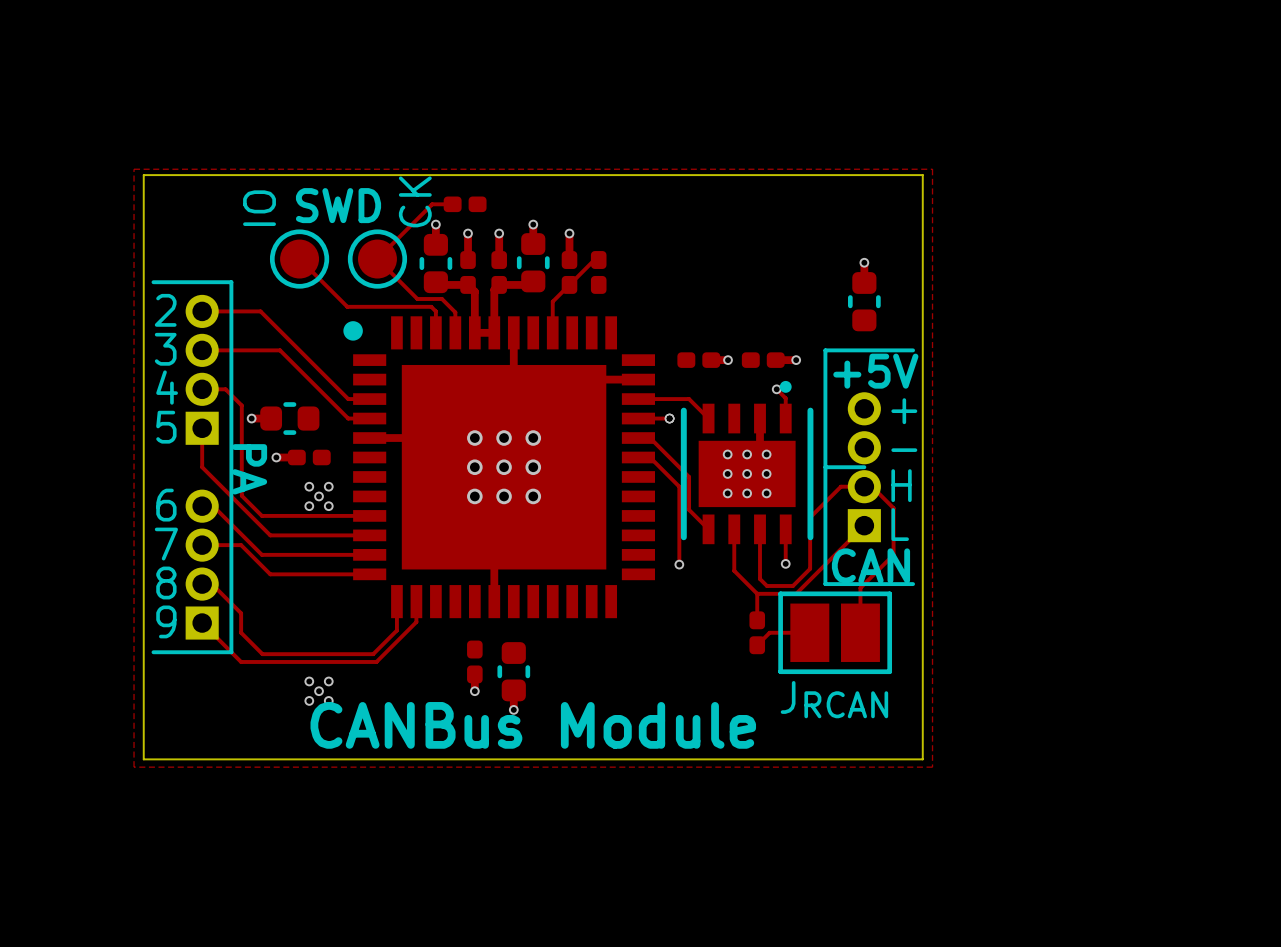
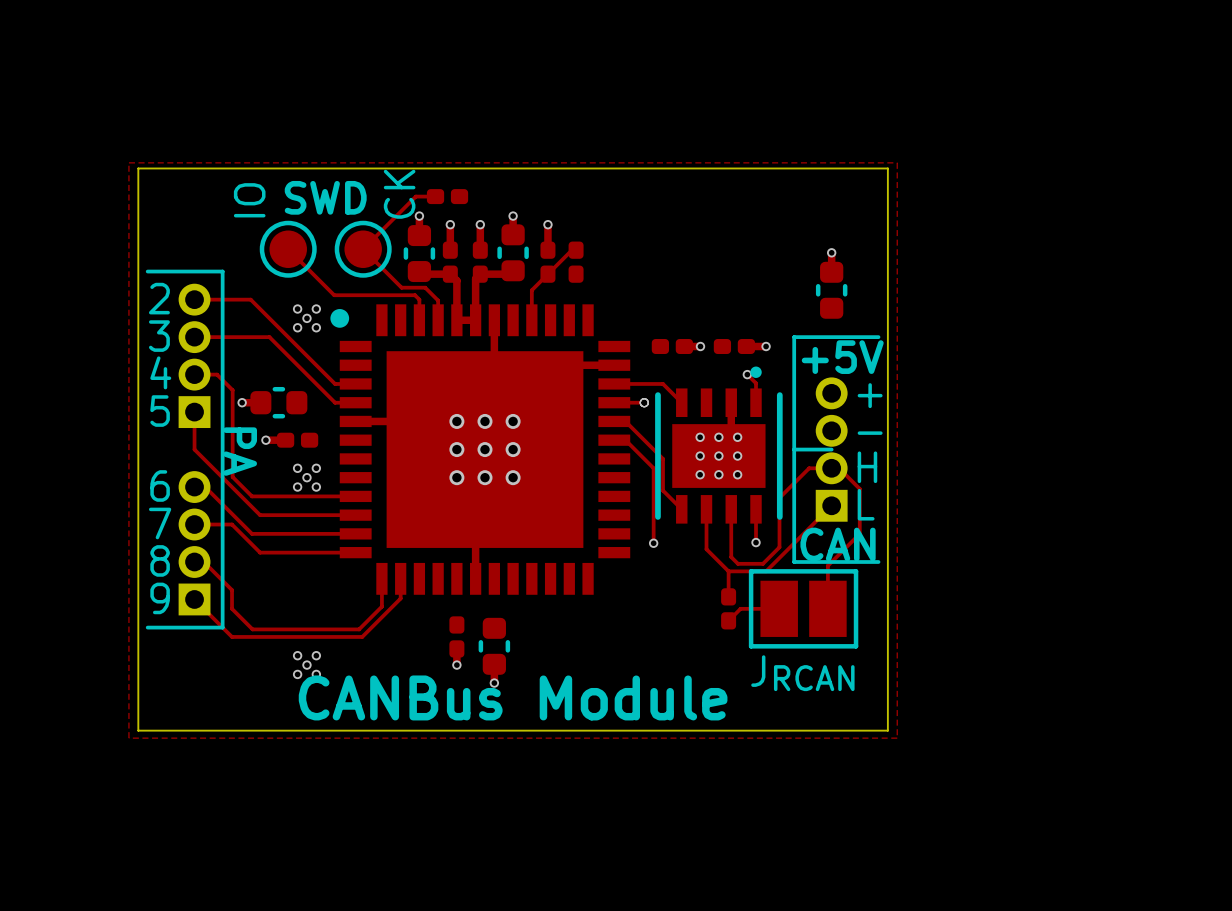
via: none -> (297, 309)
via: none -> (316, 309)
via: none -> (306, 318)
via: none -> (297, 327)
via: none -> (316, 327)

